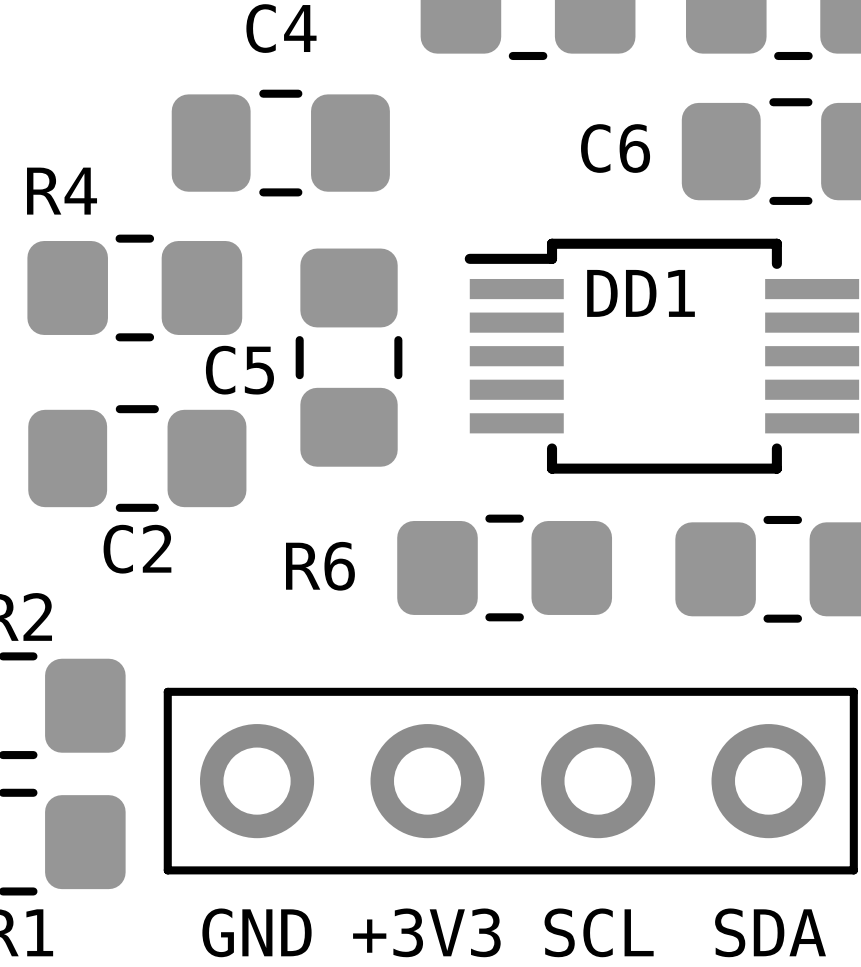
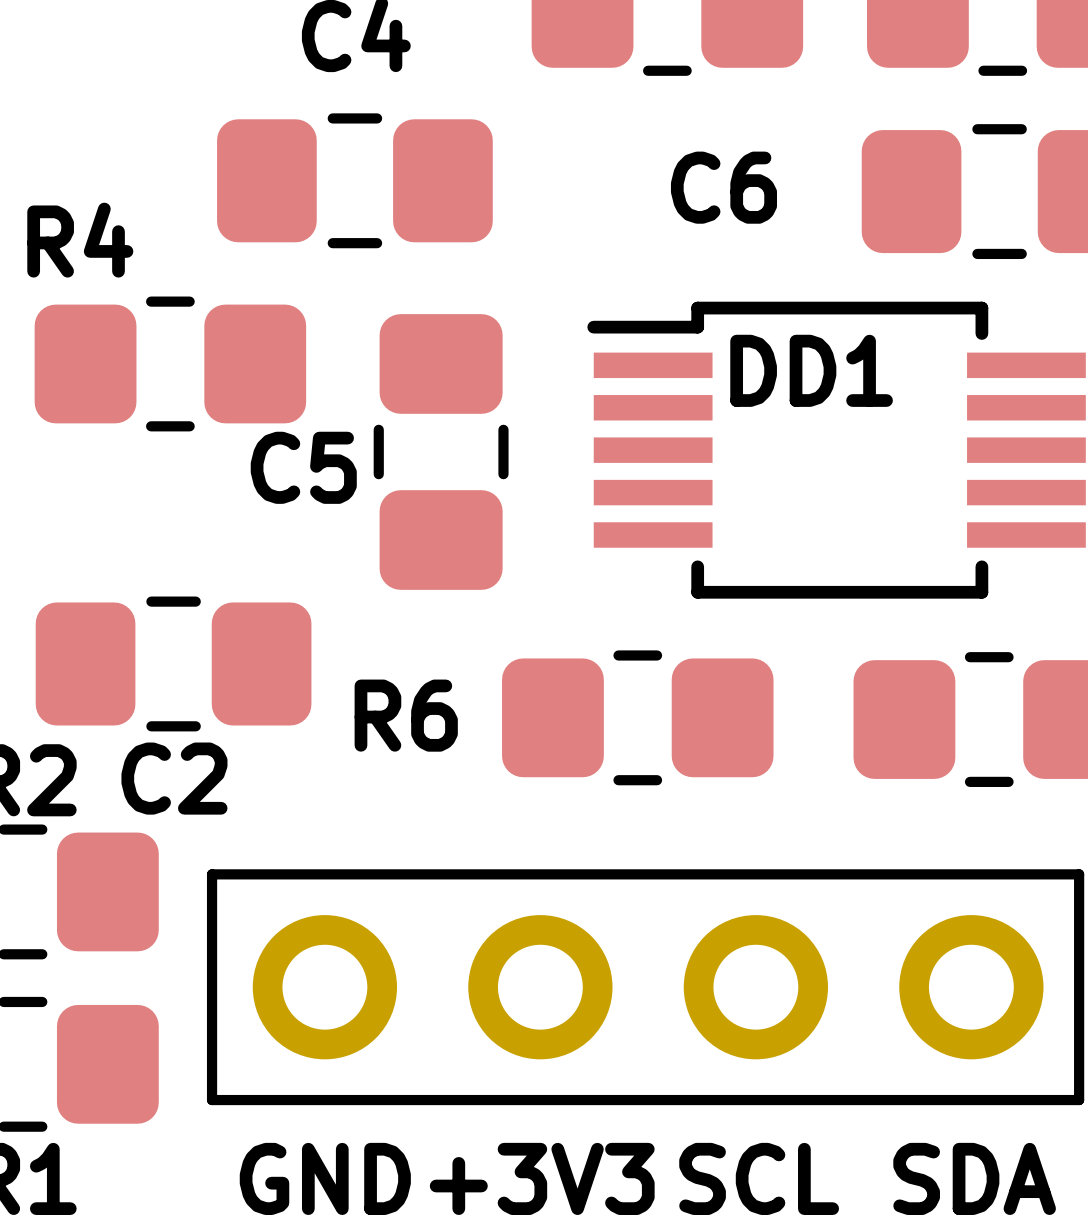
C6 name position: C6 (615, 148) -> C6 (723, 187)
C2 position: (137, 458) -> (173, 663)

